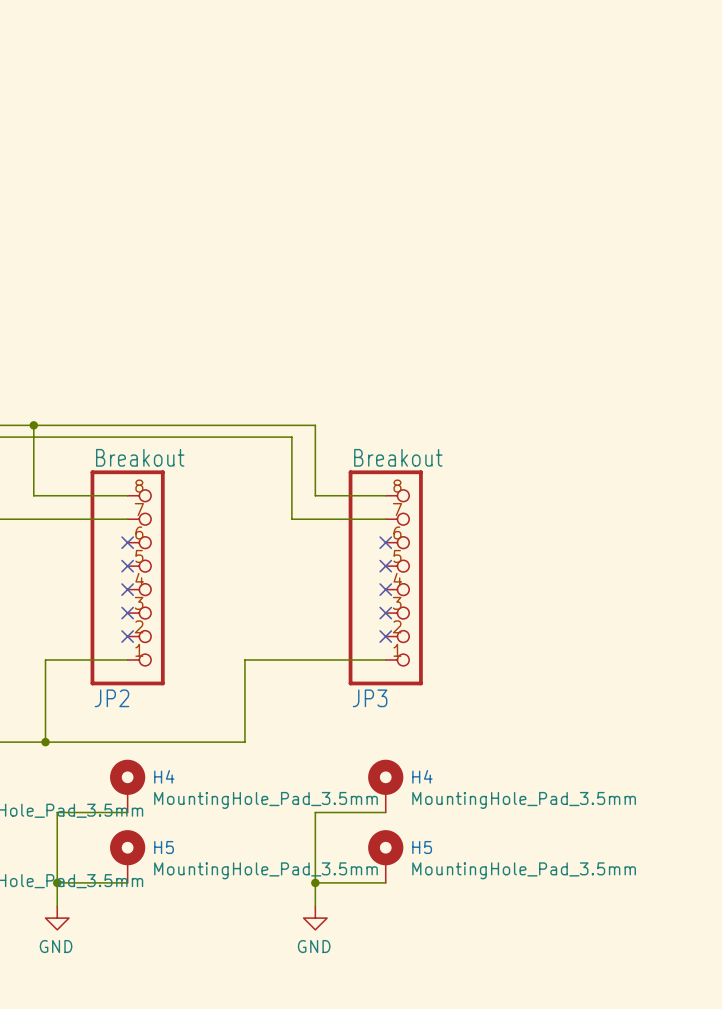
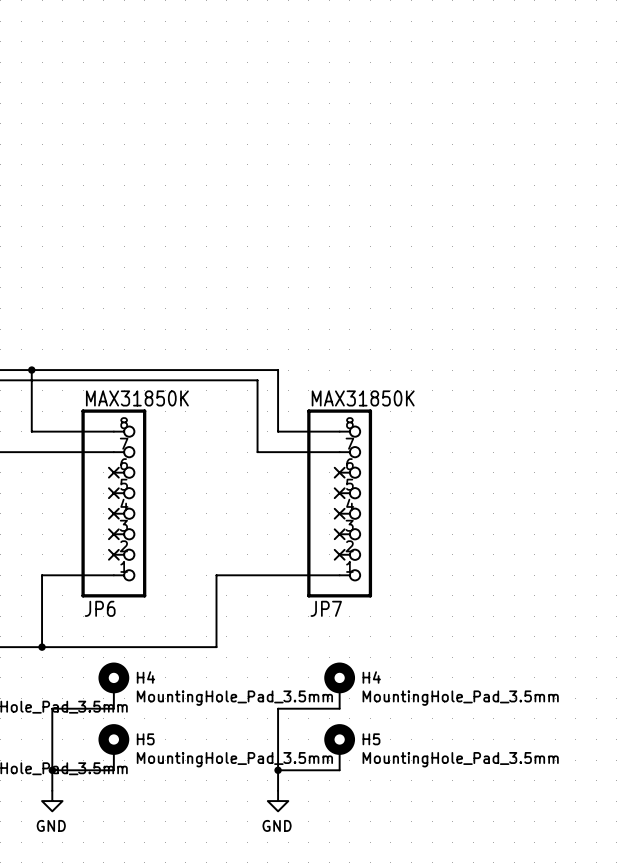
JP2 value: Breakout (140, 457) -> MAX31850K (137, 398)
JP3 value: Breakout (398, 457) -> MAX31850K (363, 398)
JP2 name: JP2 (111, 698) -> JP6 (100, 608)
JP3 name: JP3 (370, 698) -> JP7 (326, 608)

